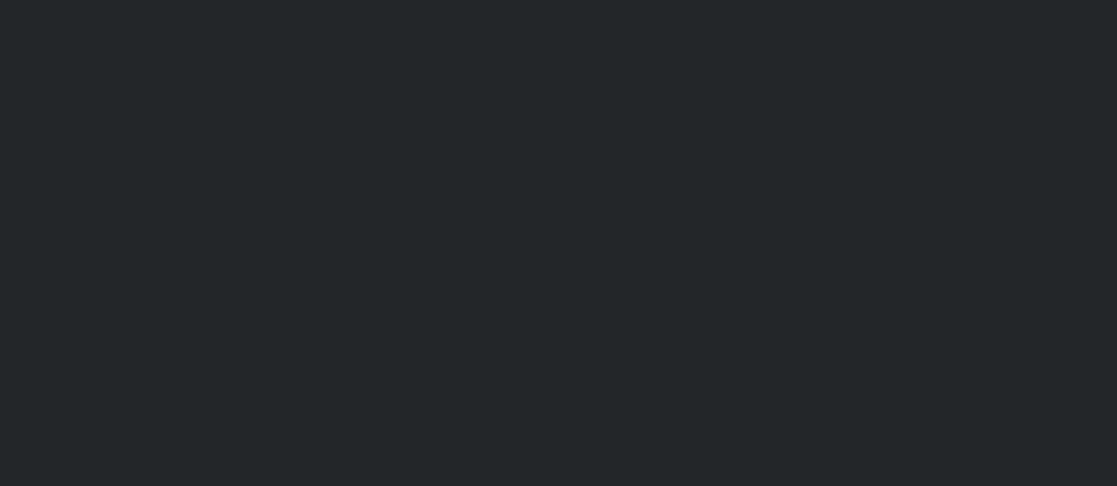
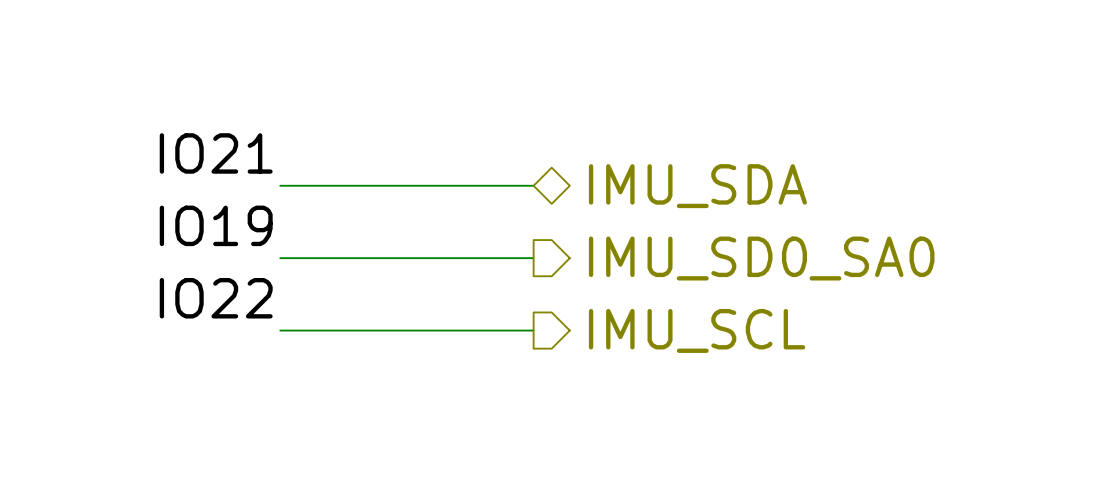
label: none -> IO21 (216, 153)
wire: none -> (280, 185) (533, 185)
hierarchical label: none -> IMU_SDA (697, 186)
label: none -> IO19 (216, 225)
wire: none -> (280, 258) (533, 258)
hierarchical label: none -> IMU_SD0_SA0 (761, 258)
label: none -> IO22 (216, 298)
wire: none -> (280, 330) (533, 330)
hierarchical label: none -> IMU_SCL (697, 330)

